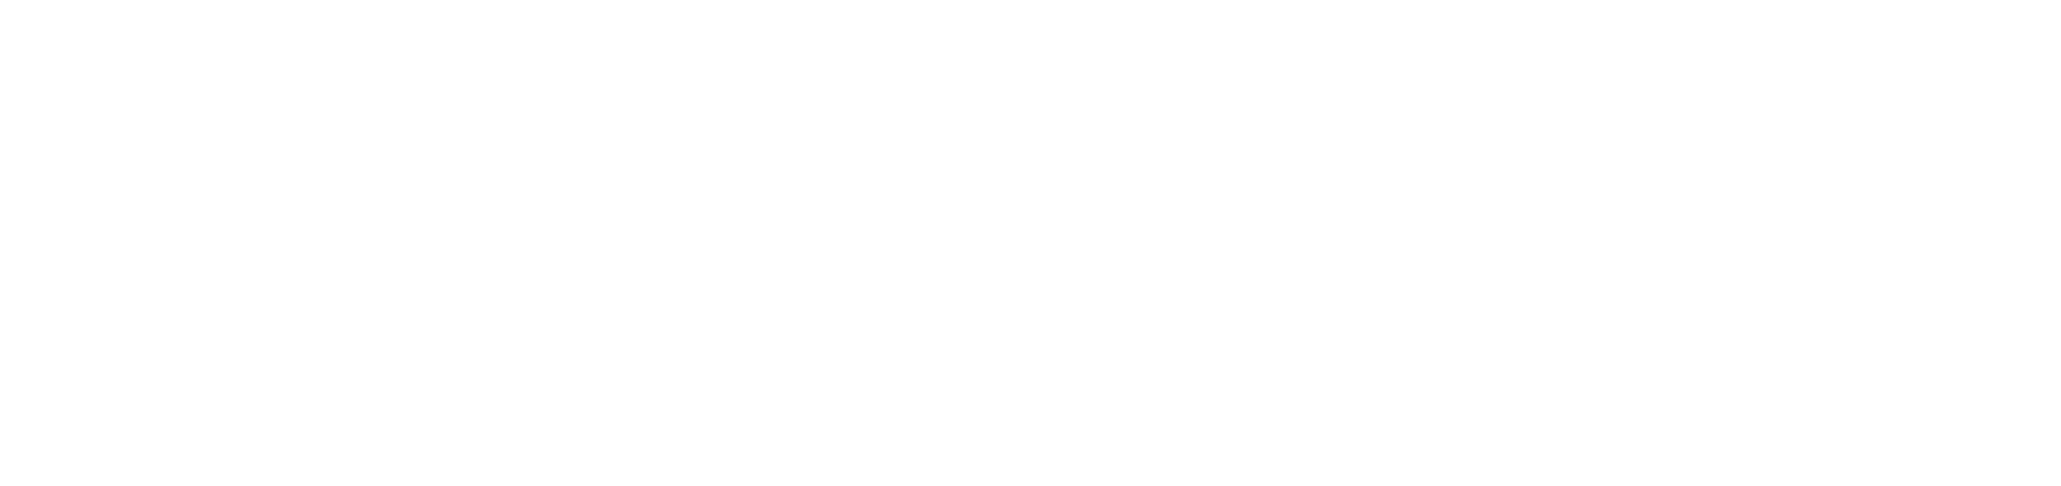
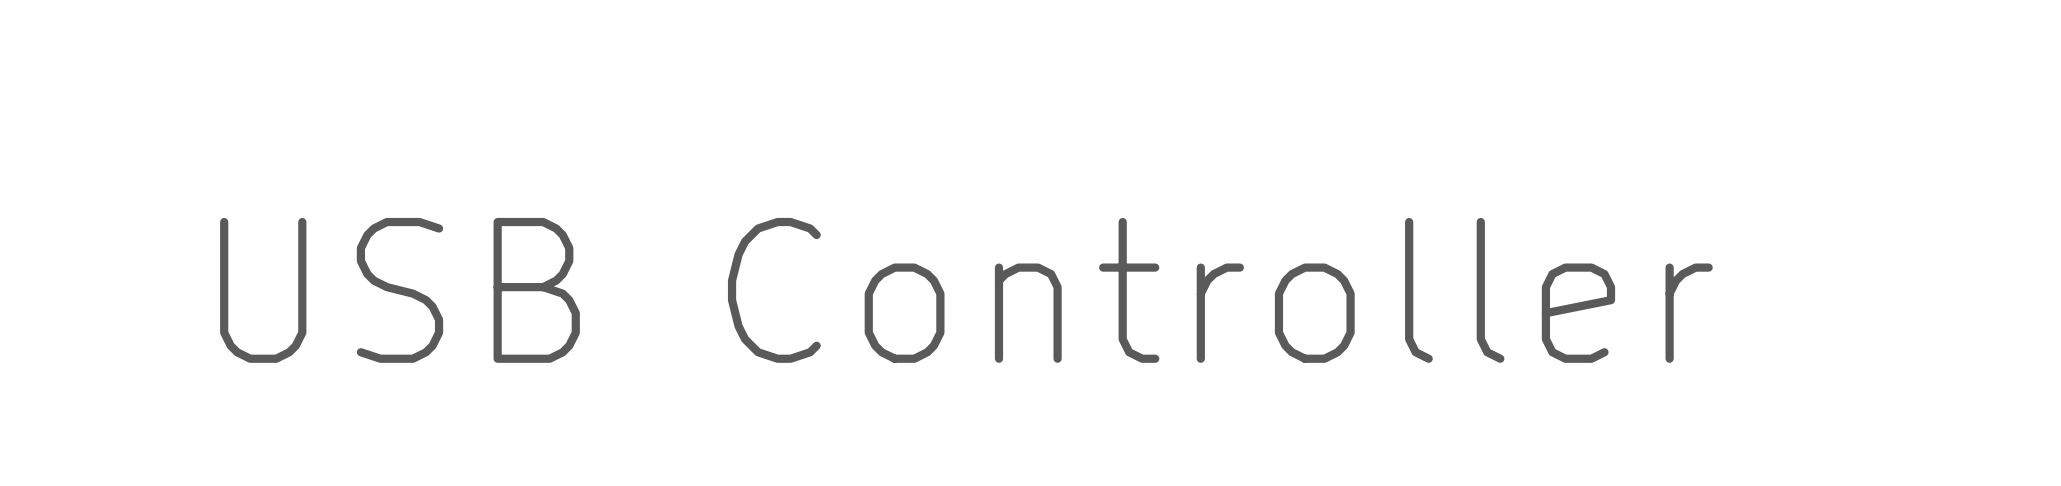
text: none -> USB Controller (966, 290)

